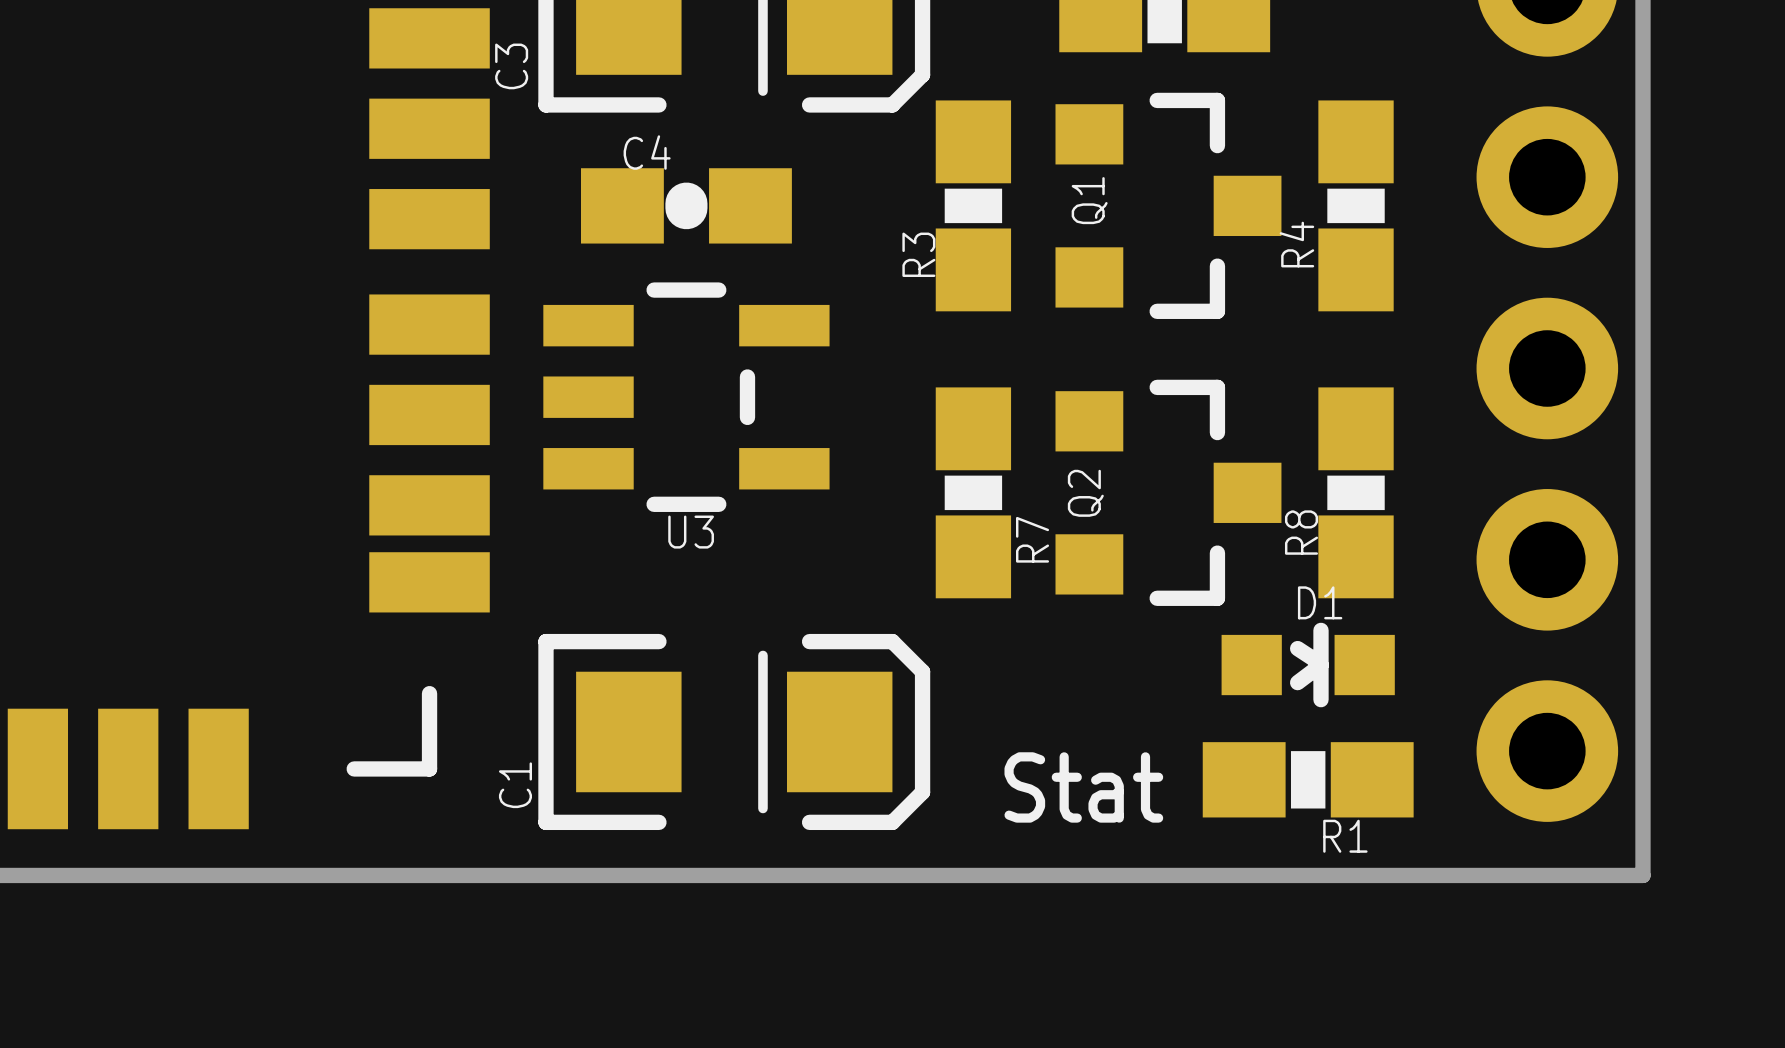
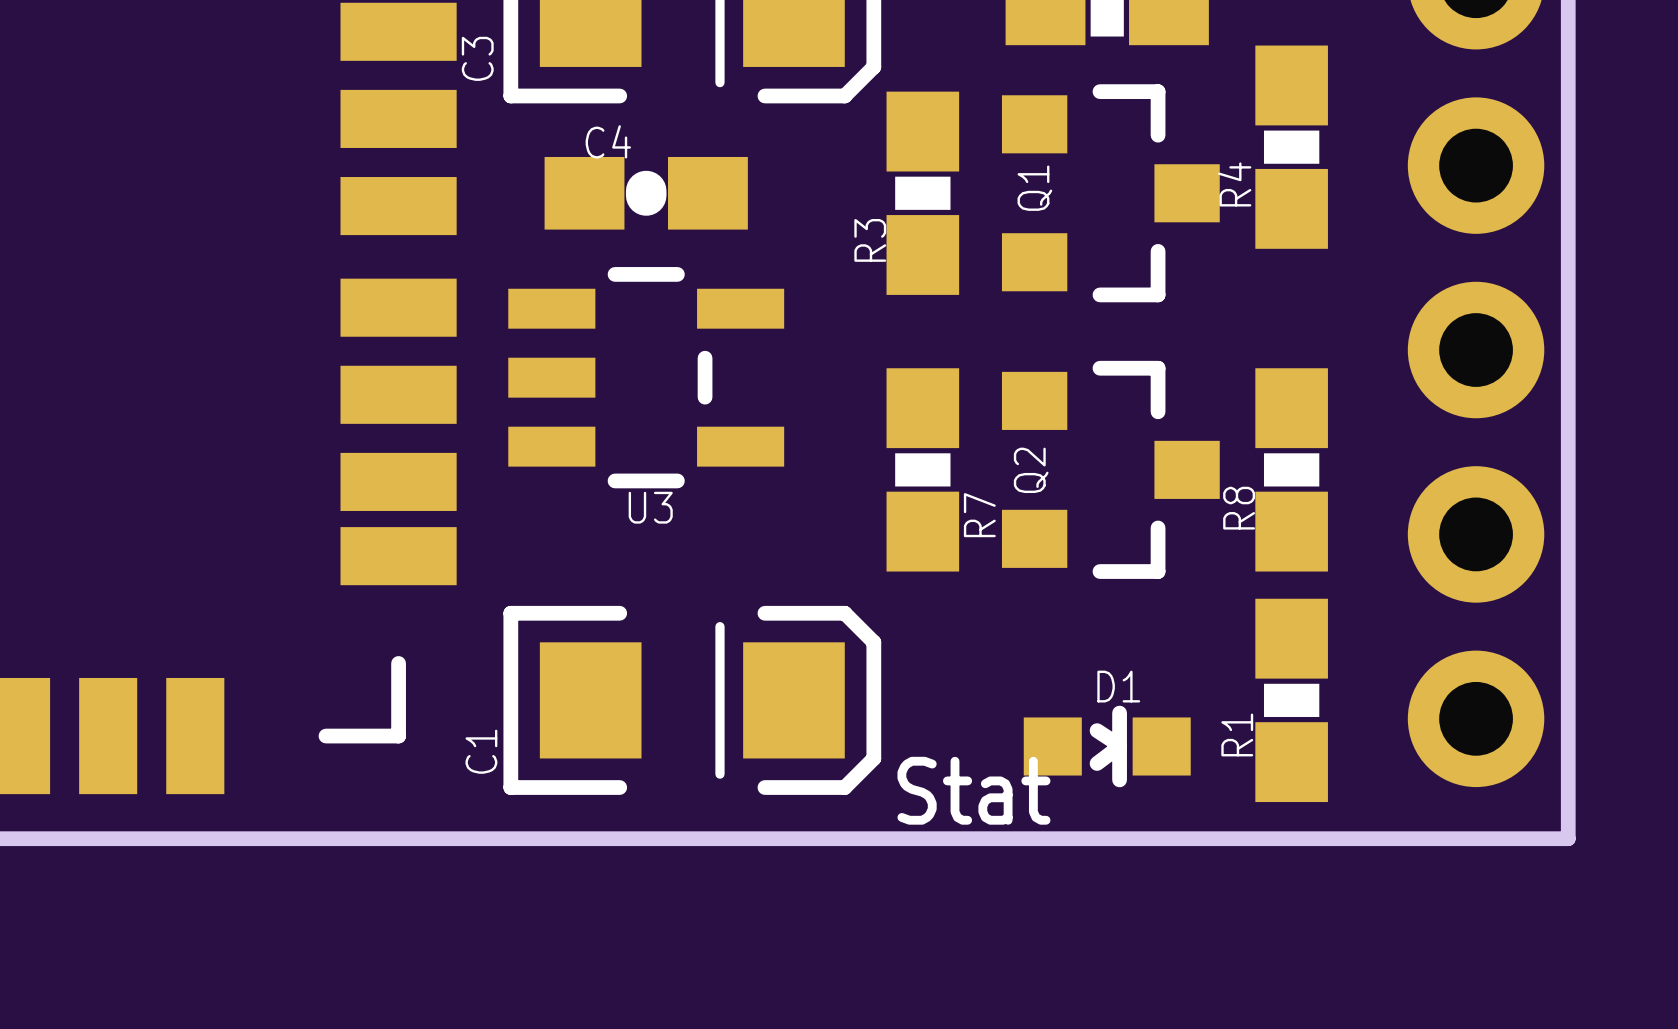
R4 position: (1356, 205) -> (1291, 147)
D1 position: (1308, 665) -> (1107, 746)
R1 rotation: 0° (1308, 779) -> 90° clockwise (1291, 700)
text position: Stat (1083, 787) -> Stat (973, 790)

